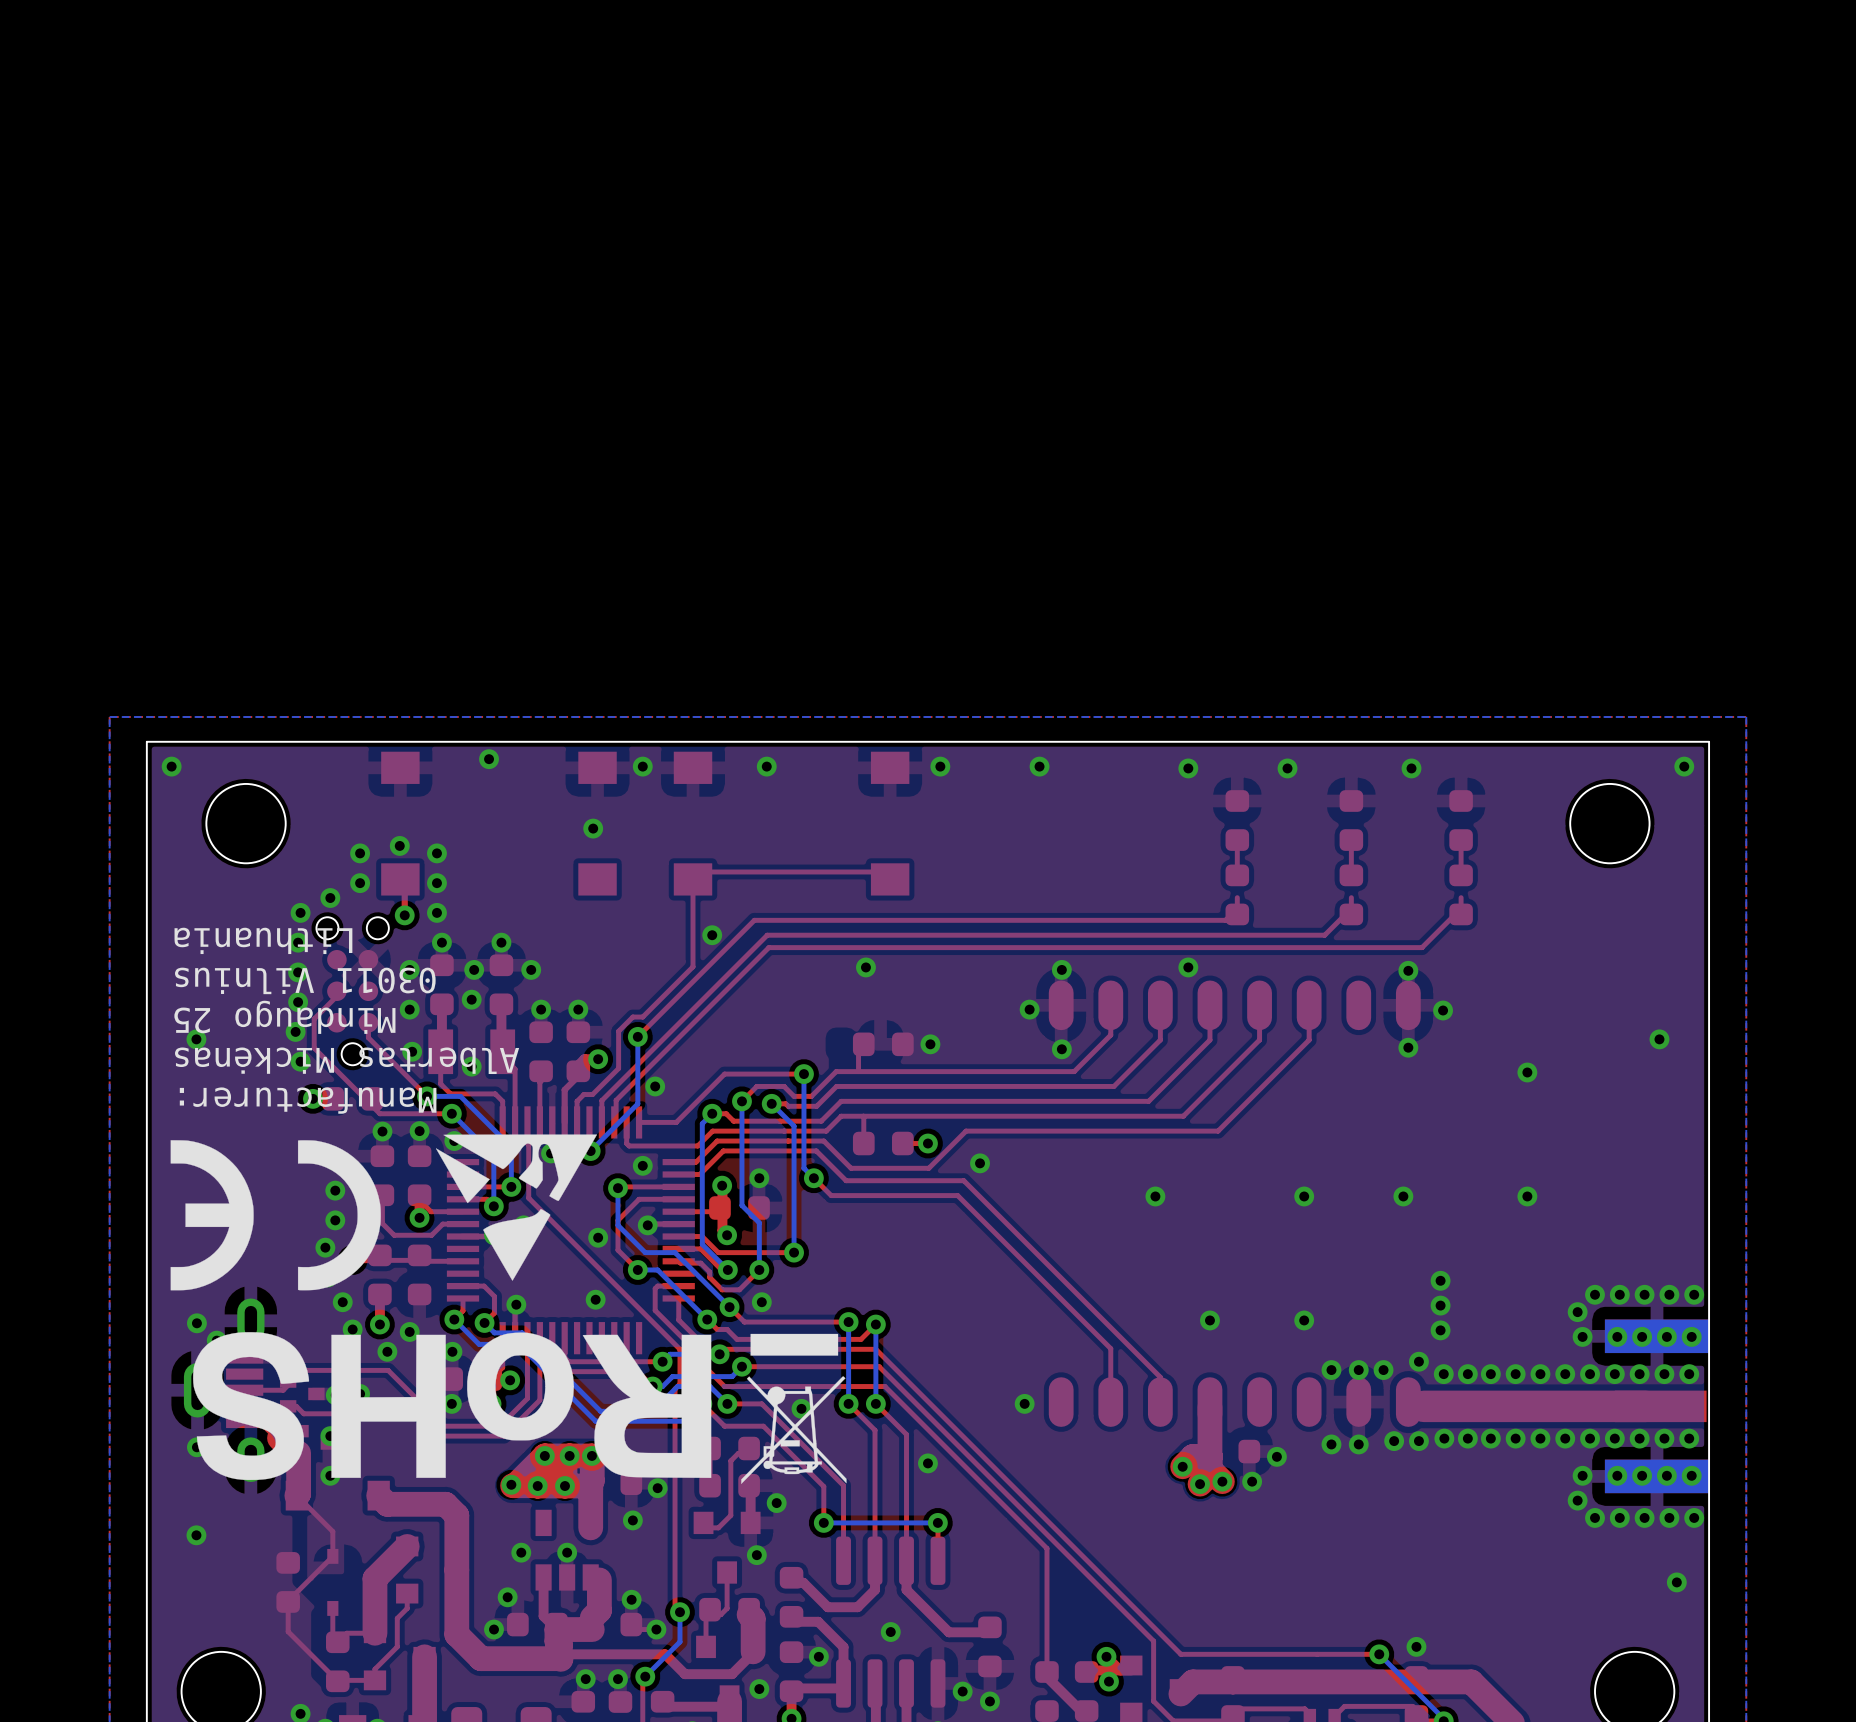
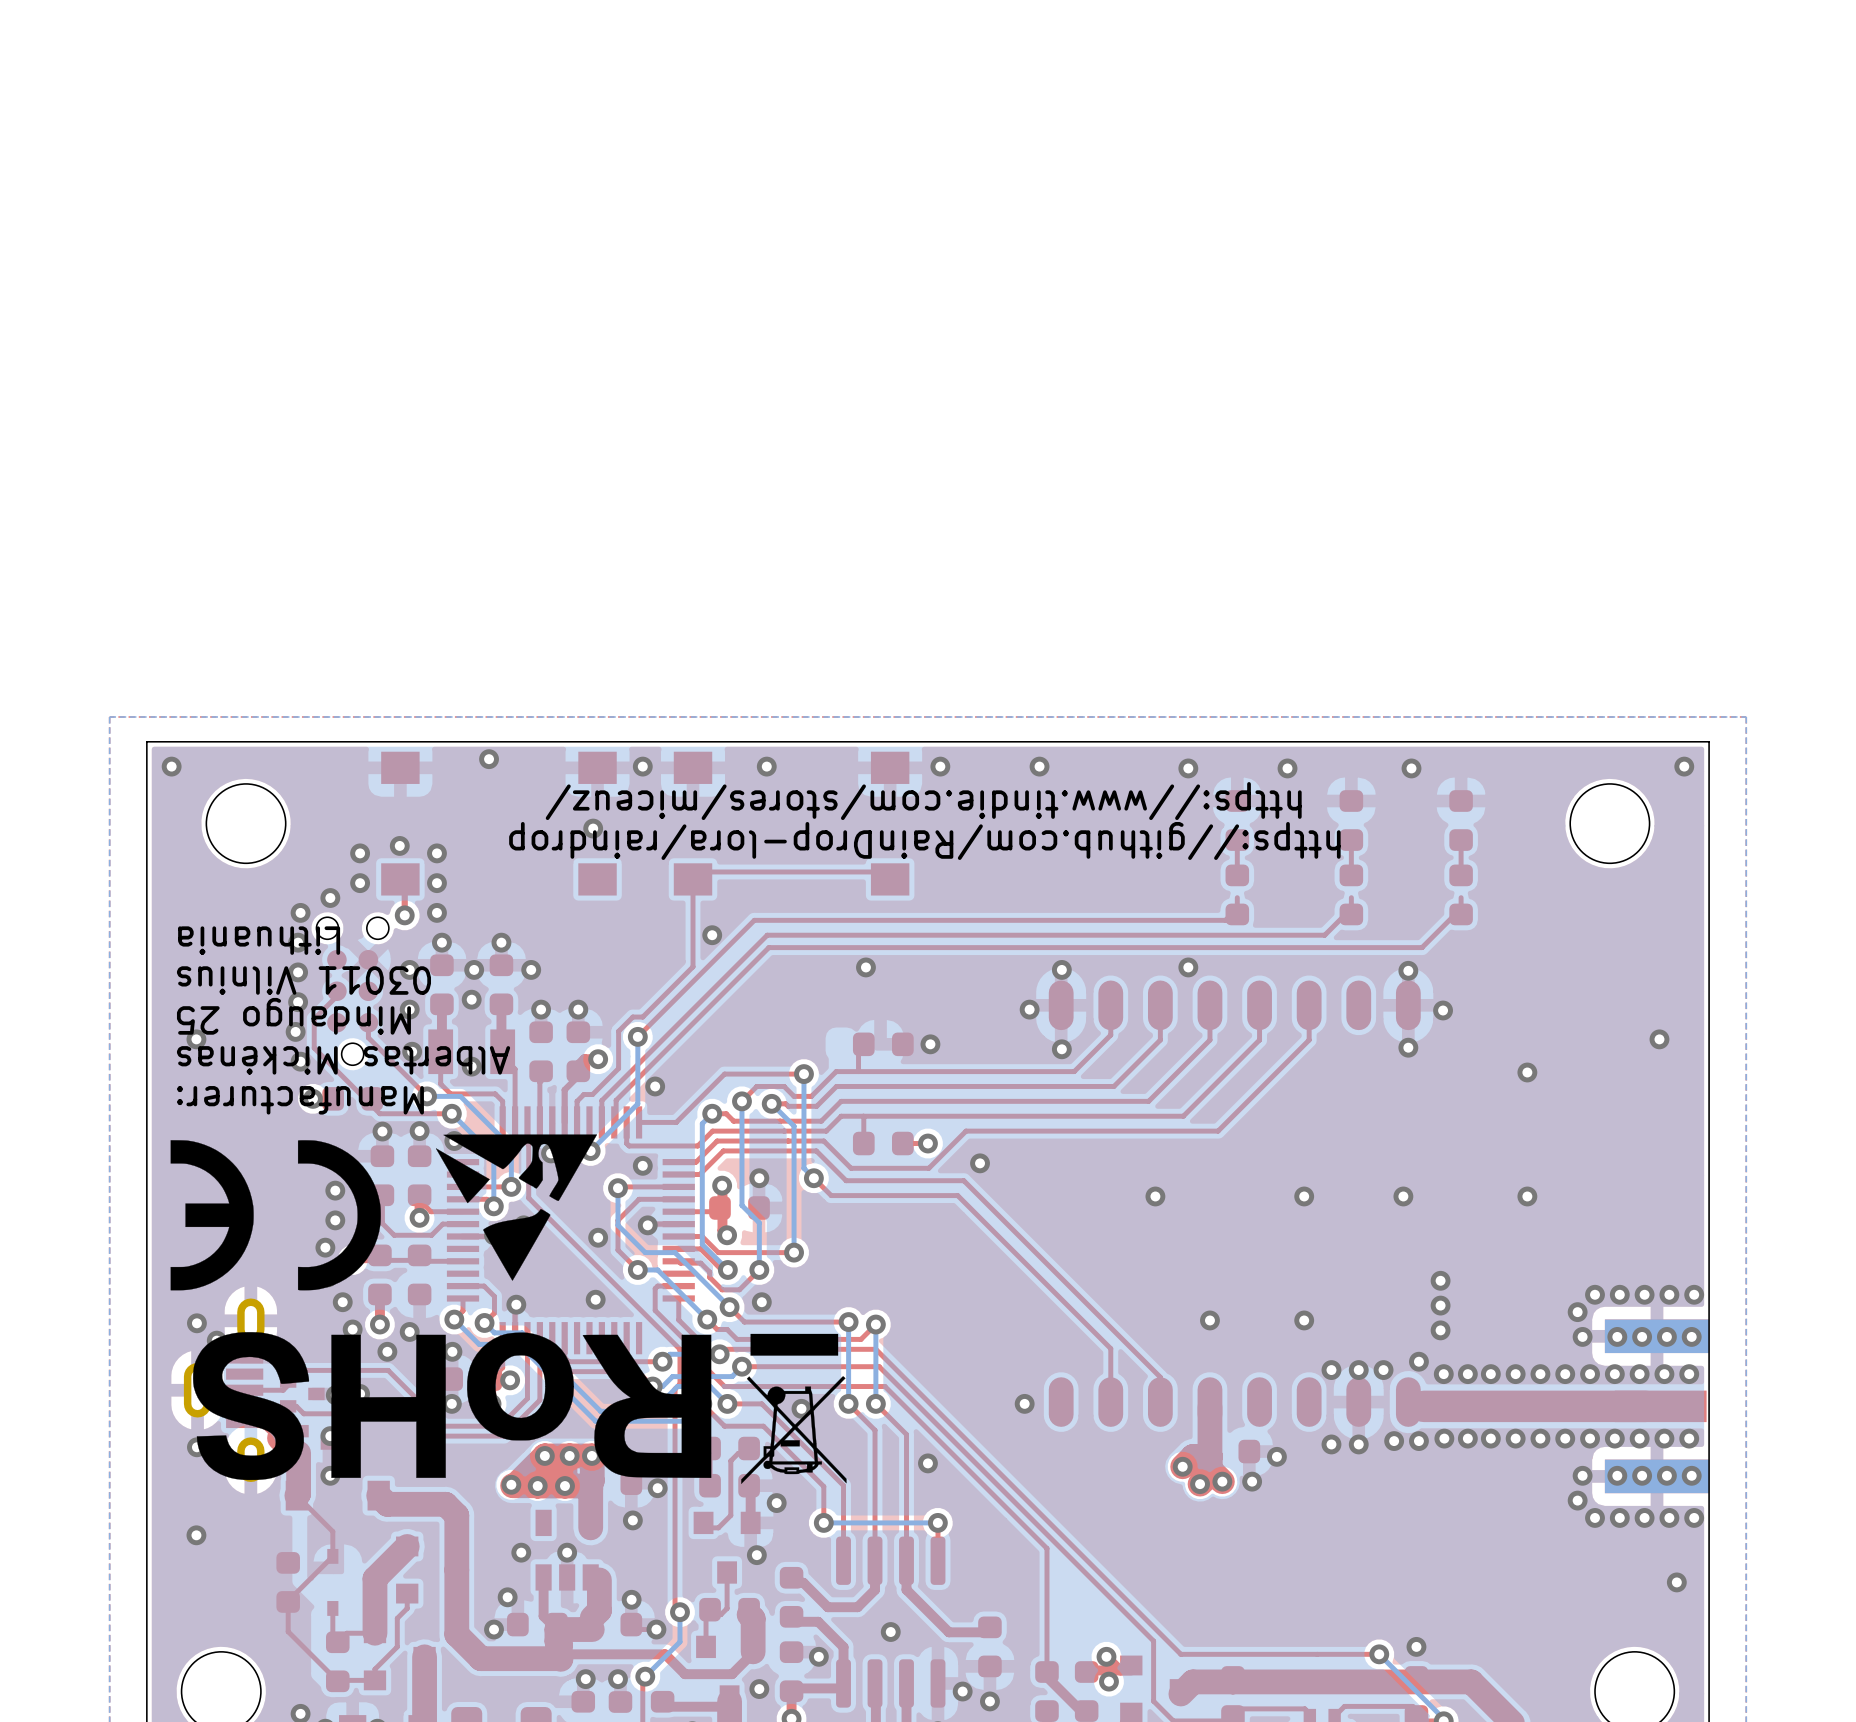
text: none -> https://www.tindie.com/stores/miceuz/ (923, 801)
text: none -> https://github.com/RainDrop-lora/raindrop (924, 840)

